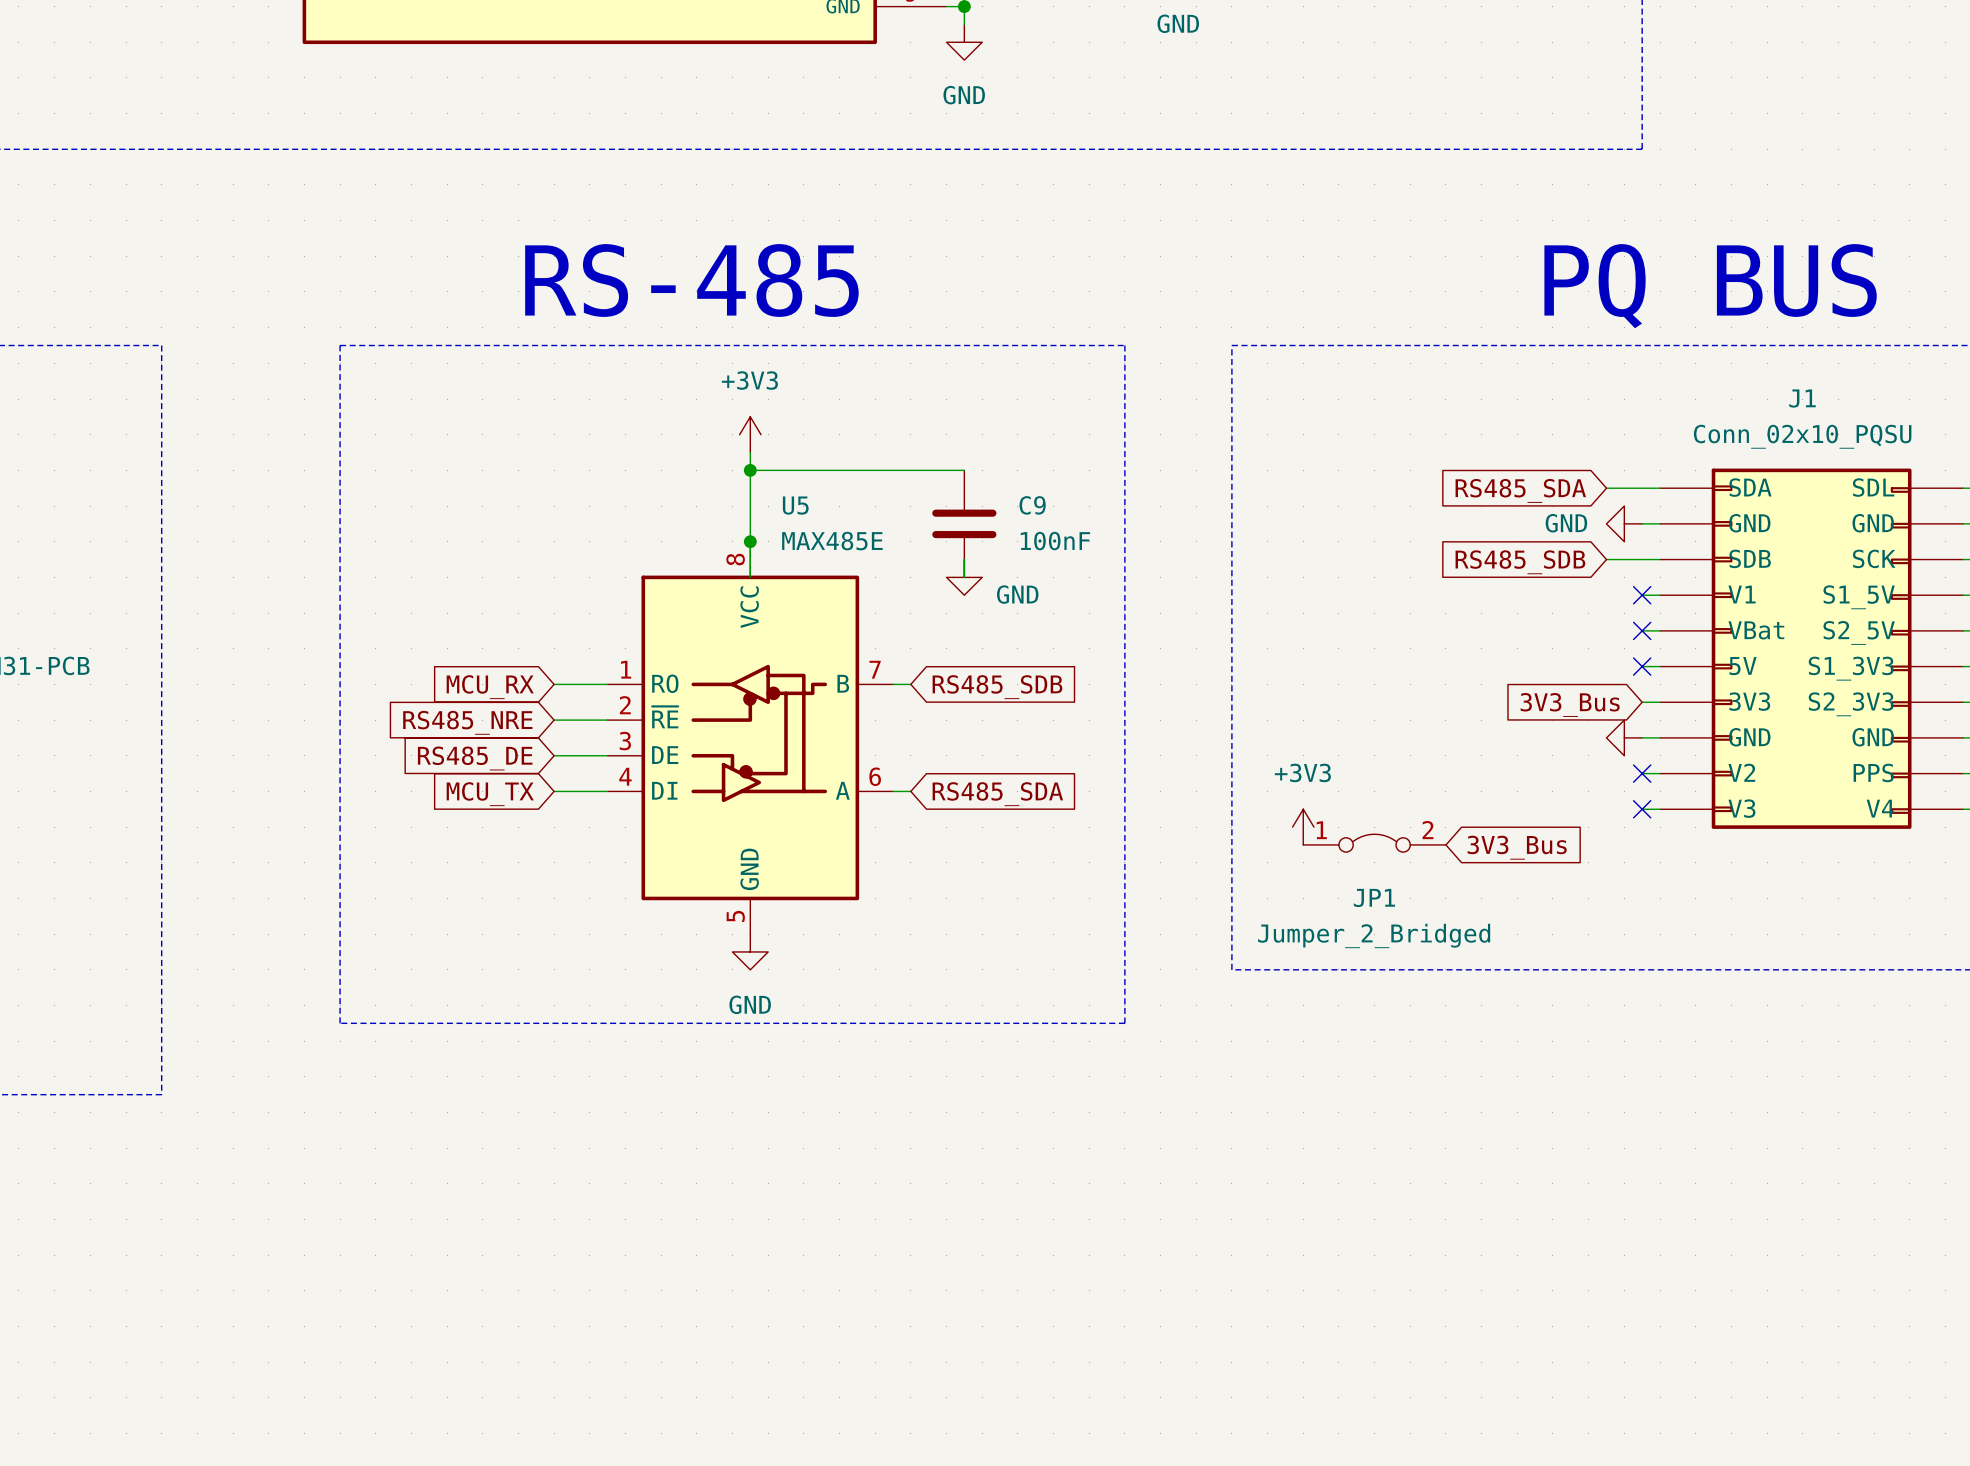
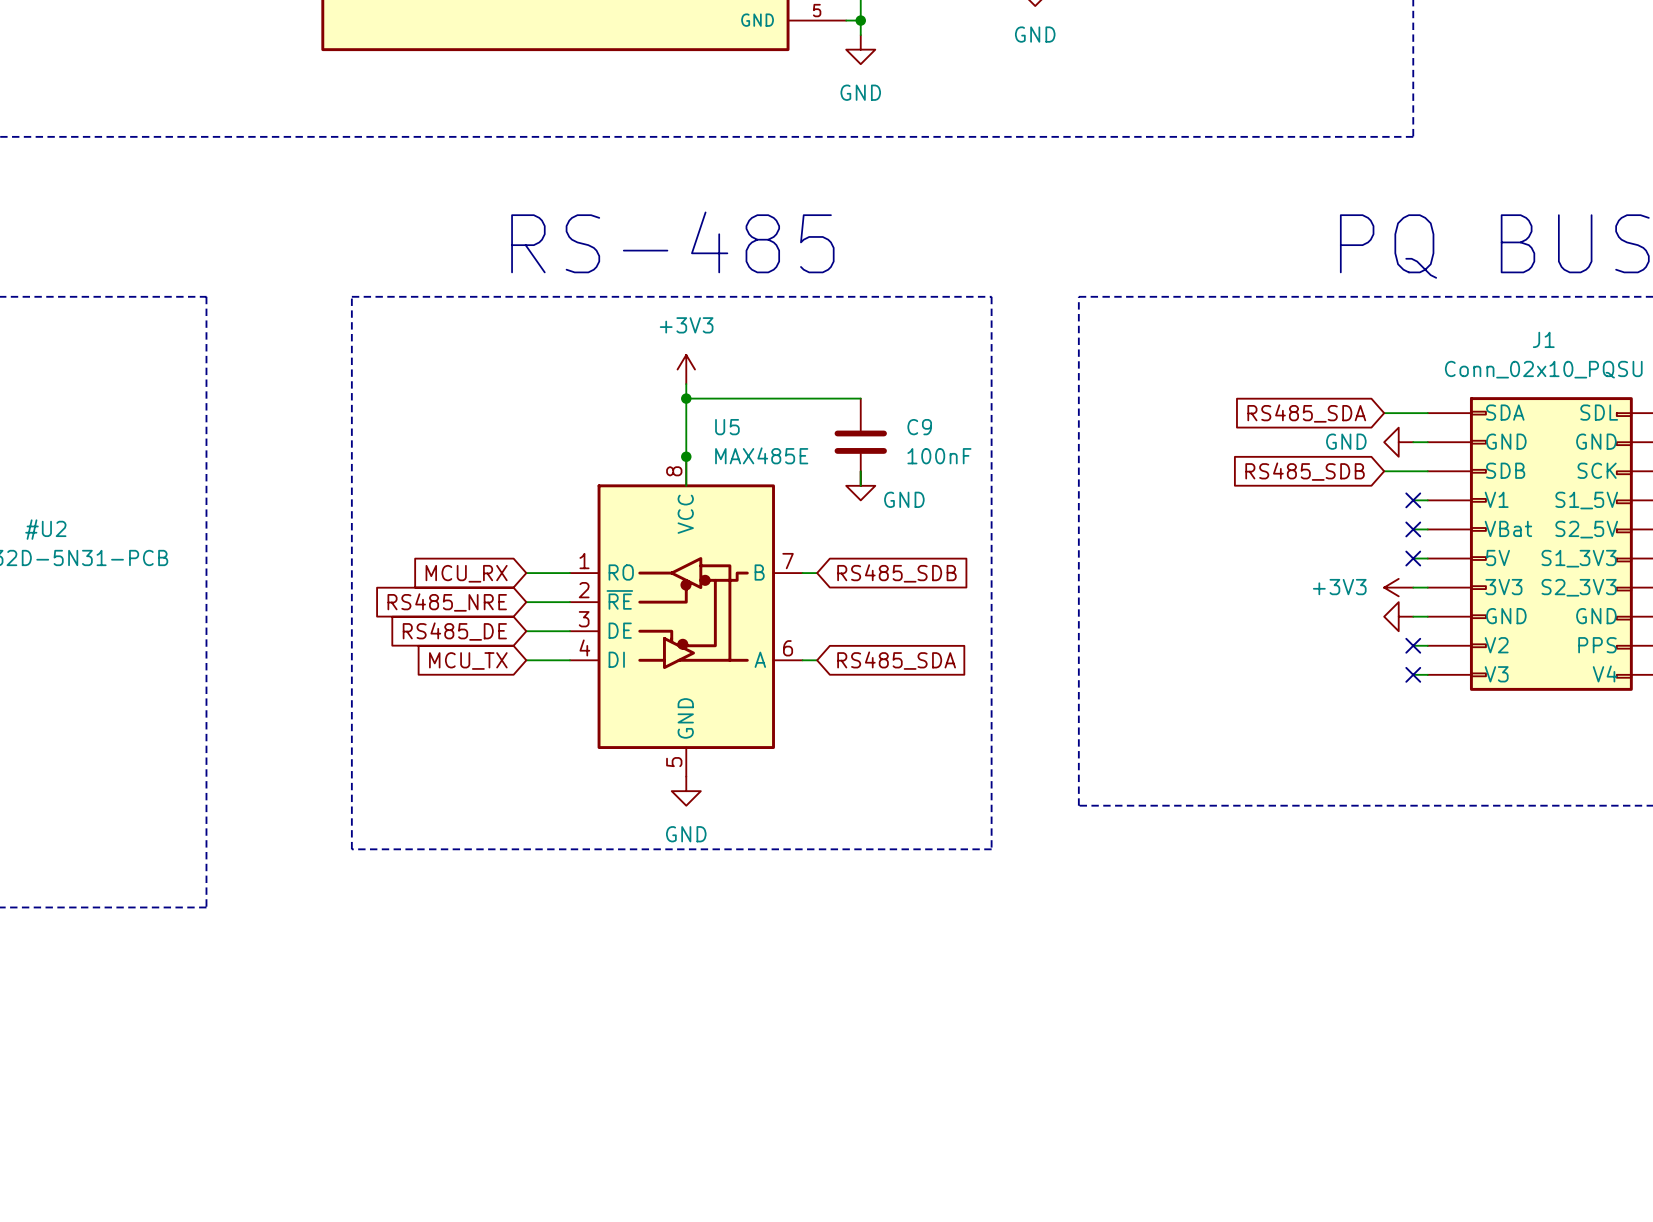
global label: 3V3_Bus (1570, 704) -> none
power symbol rotation: 0° (1303, 827) -> 90° counterclockwise (1398, 587)
power symbol position: +3V3 (1303, 827) -> +3V3 (1398, 587)
JP1: Jumper_2_Bridged (1374, 843) -> none
global label: 3V3_Bus (1517, 847) -> none

